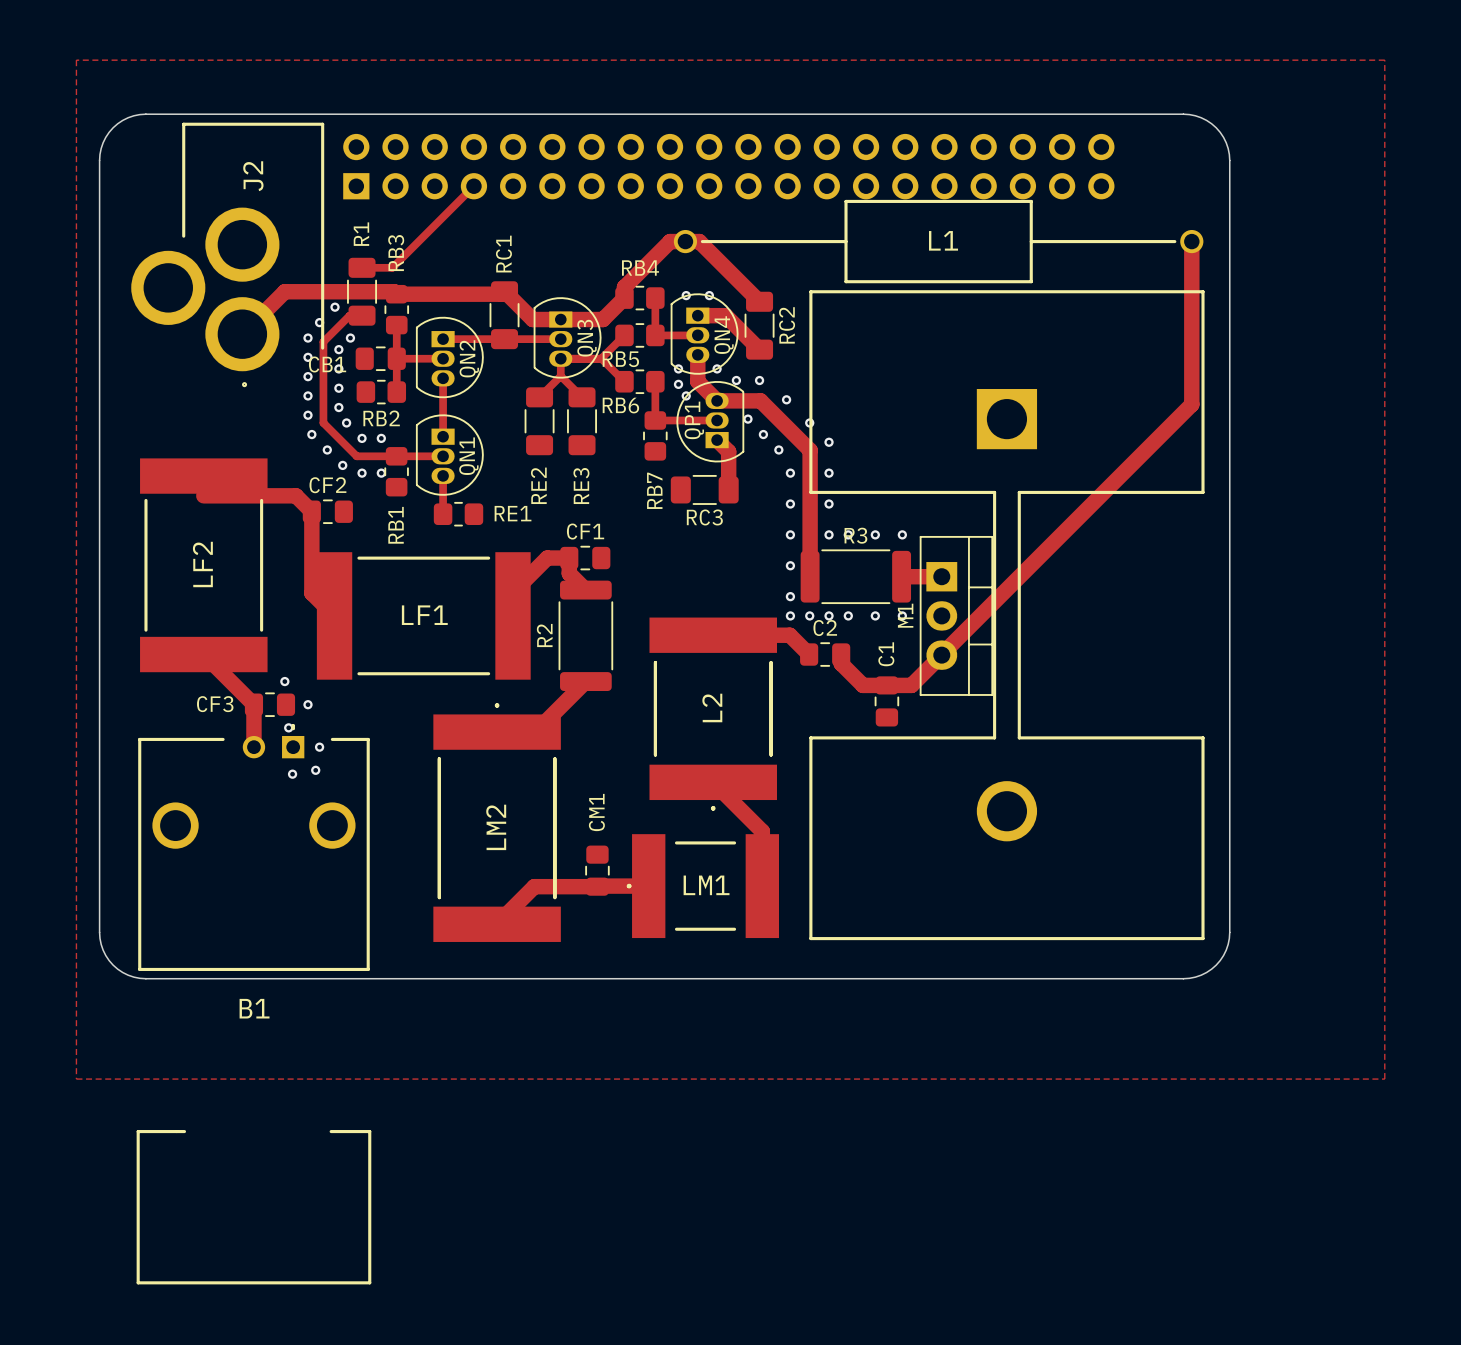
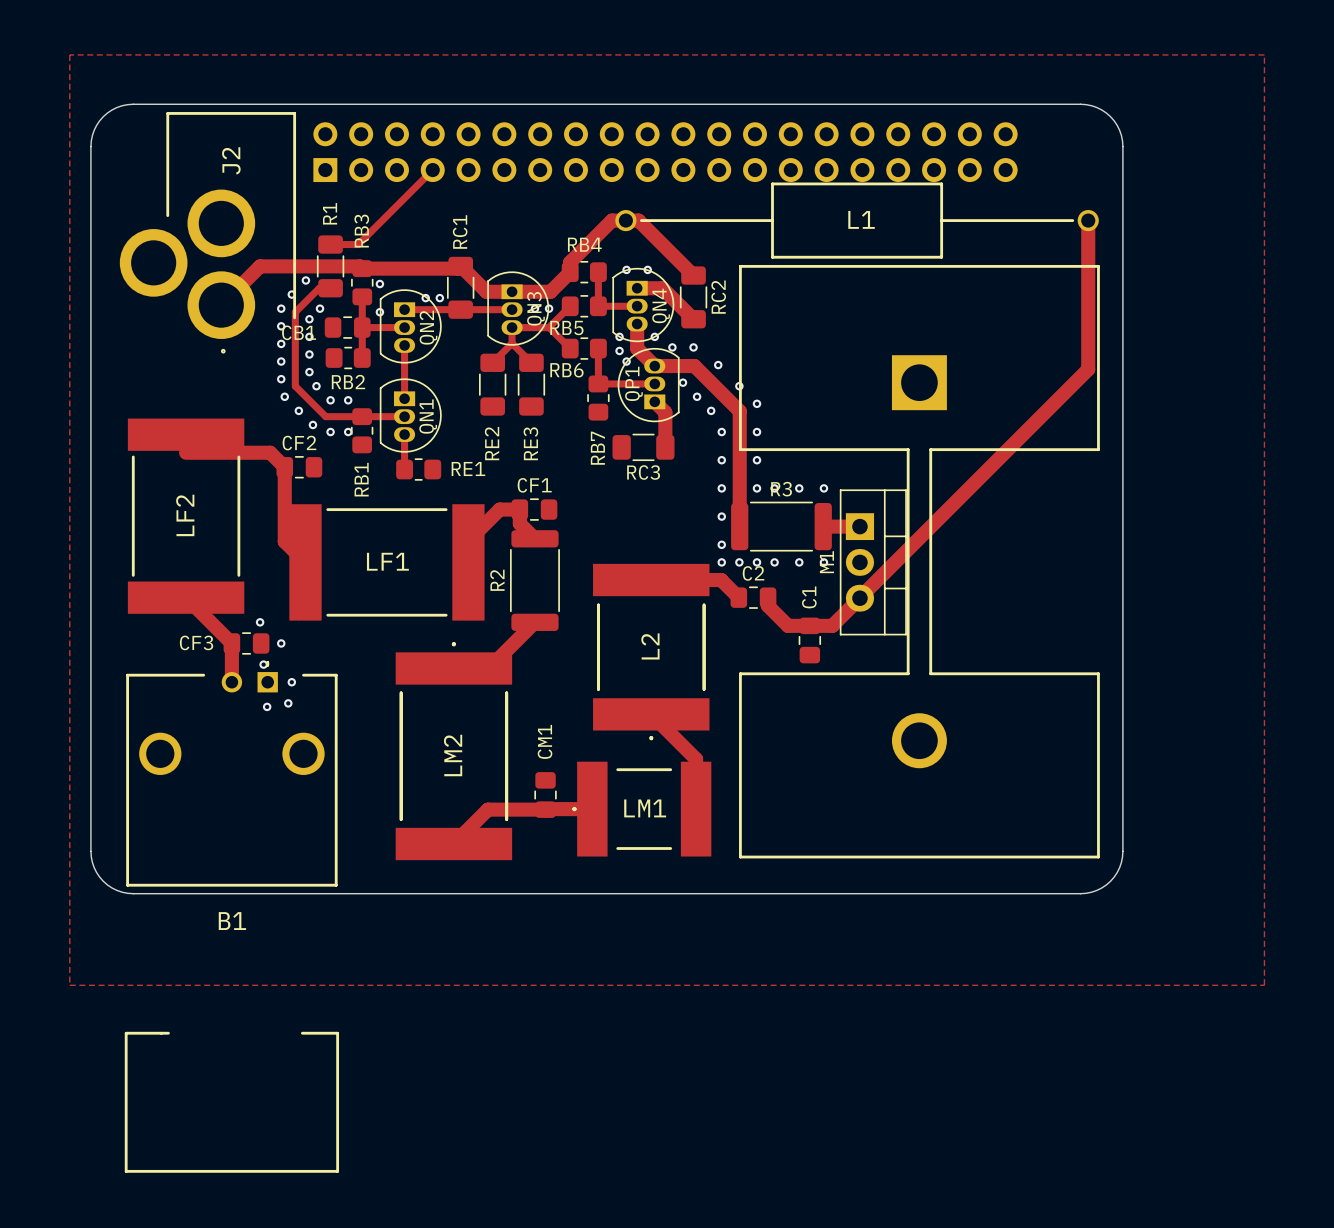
via: none -> (379, 284)
via: none -> (425, 298)
via: none -> (439, 298)
via: none -> (534, 308)
via: none -> (549, 308)
via: none -> (379, 312)

